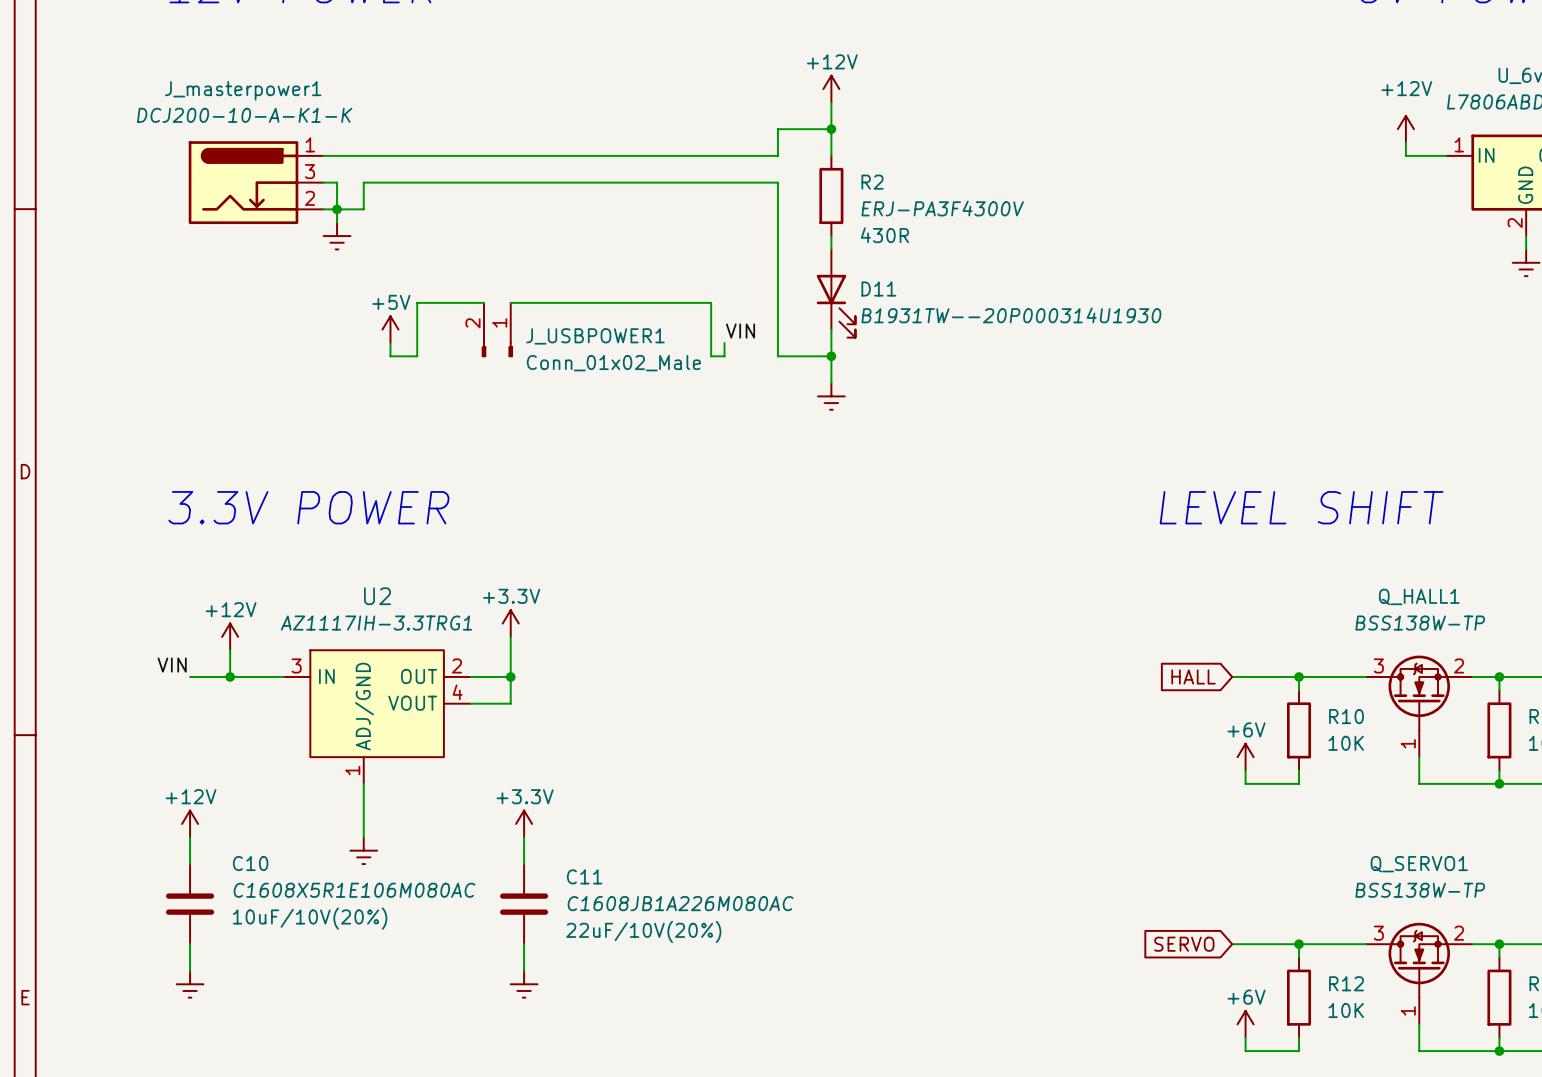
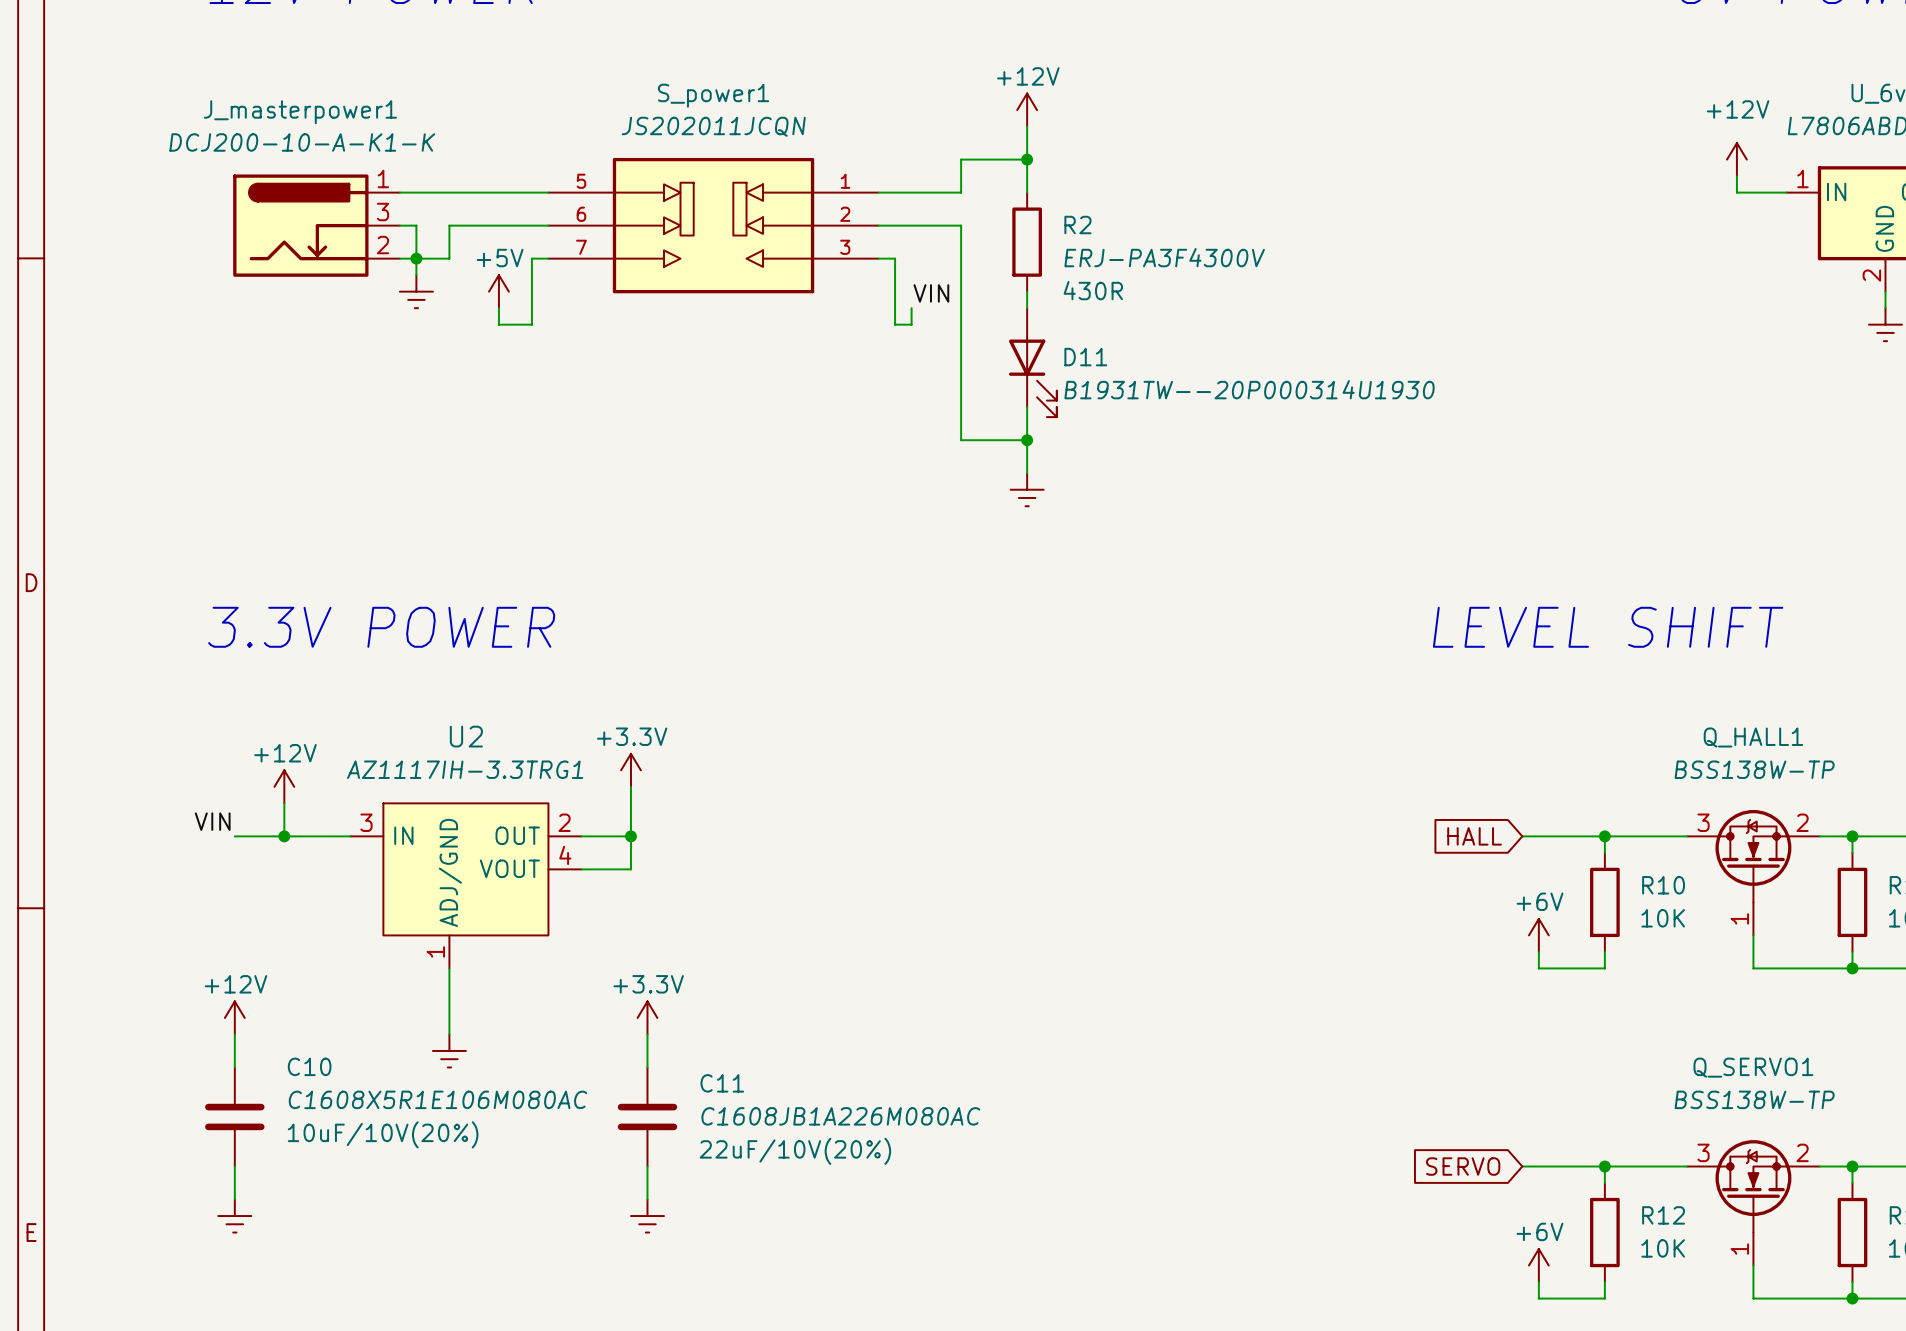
S_power1: none -> (713, 225)
wire: none -> (548, 258) (531, 258) (531, 324) (498, 324) (498, 308)
wire: none -> (878, 258) (895, 258) (895, 324) (911, 324) (911, 308)
wire: (484, 302) (417, 302) (417, 356) (390, 356) (390, 342) -> none
wire: (510, 302) (711, 302) (711, 356) (724, 356) (724, 342) -> none
power symbol position: +5V (390, 329) -> +5V (498, 291)
J_USBPOWER1: Conn_01x02_Male (497, 329) -> none
label position: VIN (740, 331) -> VIN (931, 293)

